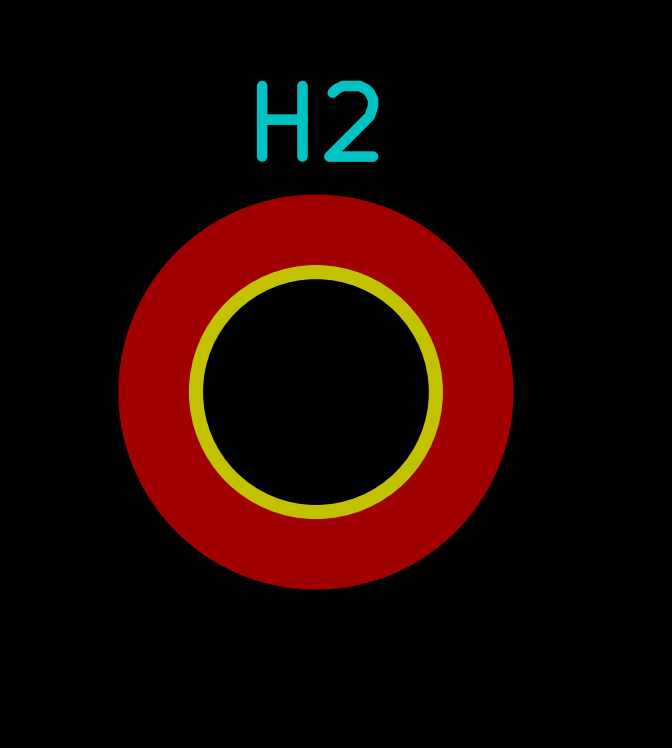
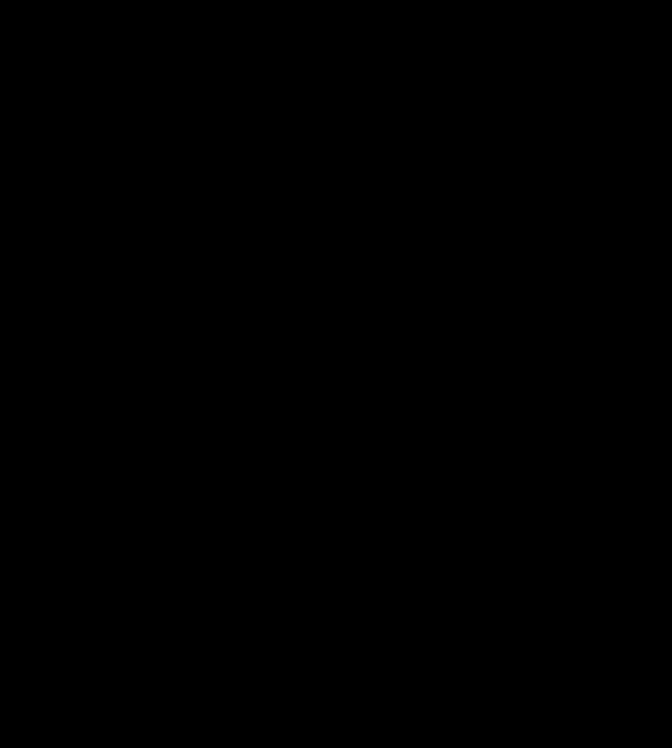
H2: (315, 392) -> none

